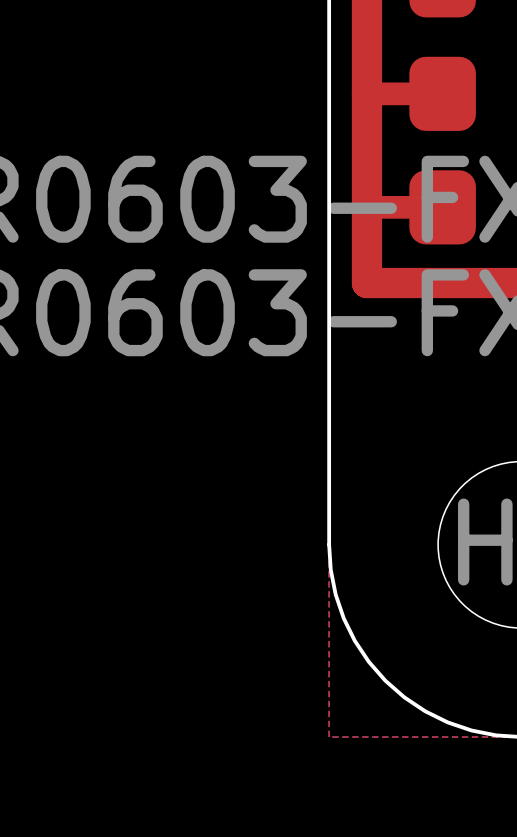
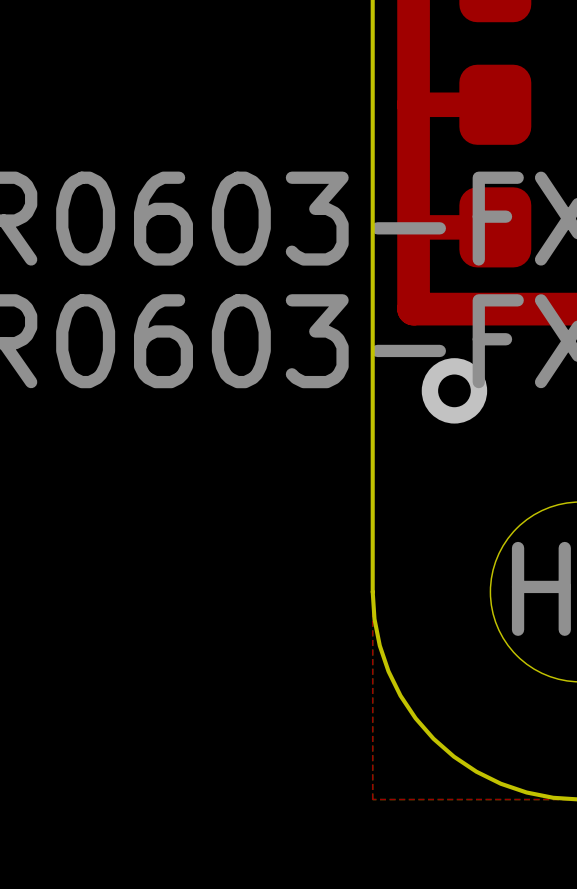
via: none -> (454, 390)

